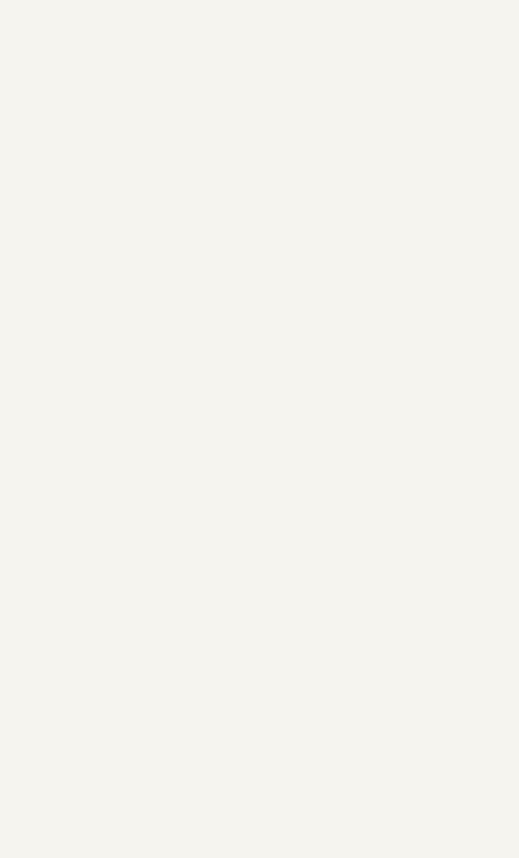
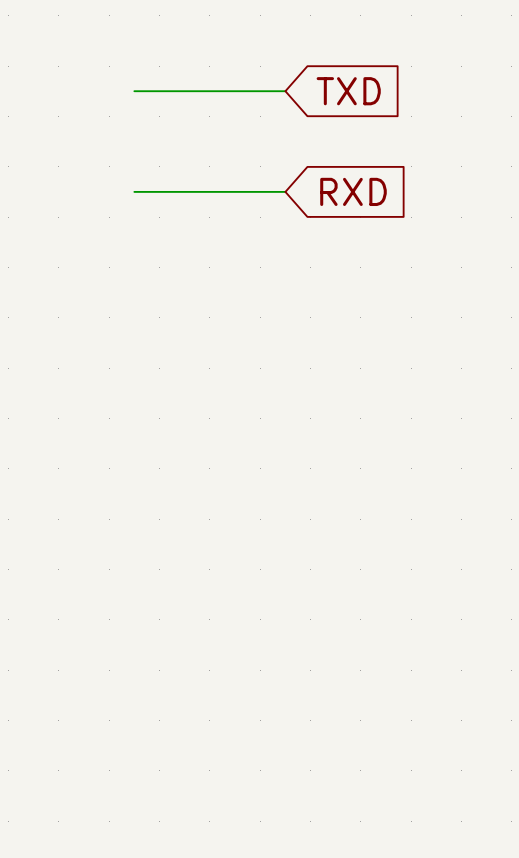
wire: none -> (134, 91) (285, 91)
global label: none -> TXD (348, 91)
wire: none -> (134, 191) (285, 191)
global label: none -> RXD (353, 191)

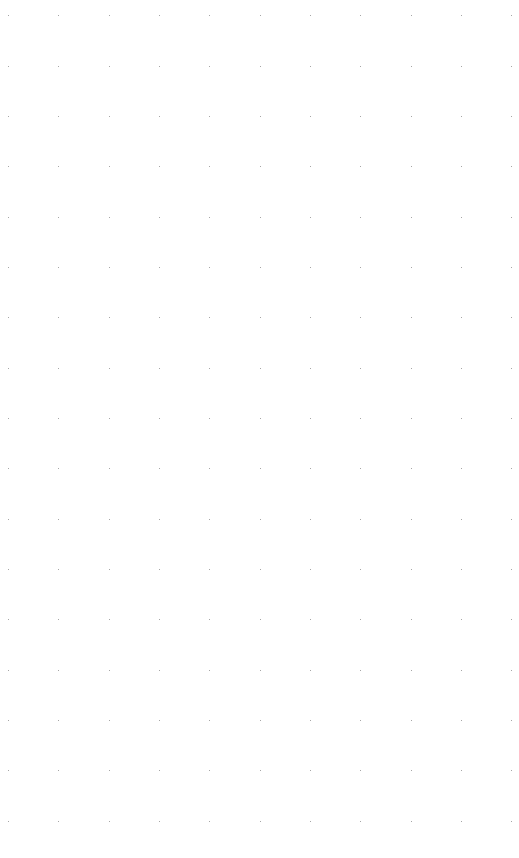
wire: (134, 91) (285, 91) -> none
global label: TXD (348, 91) -> none
wire: (134, 191) (285, 191) -> none
global label: RXD (353, 191) -> none

